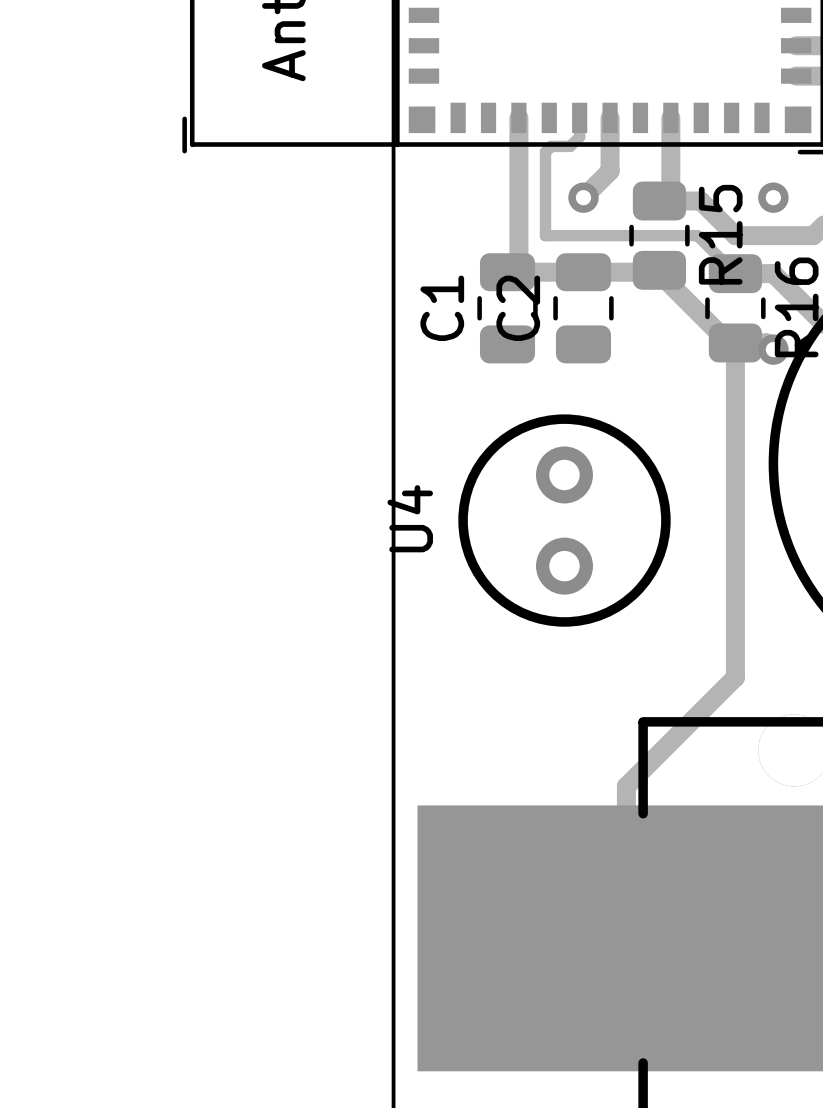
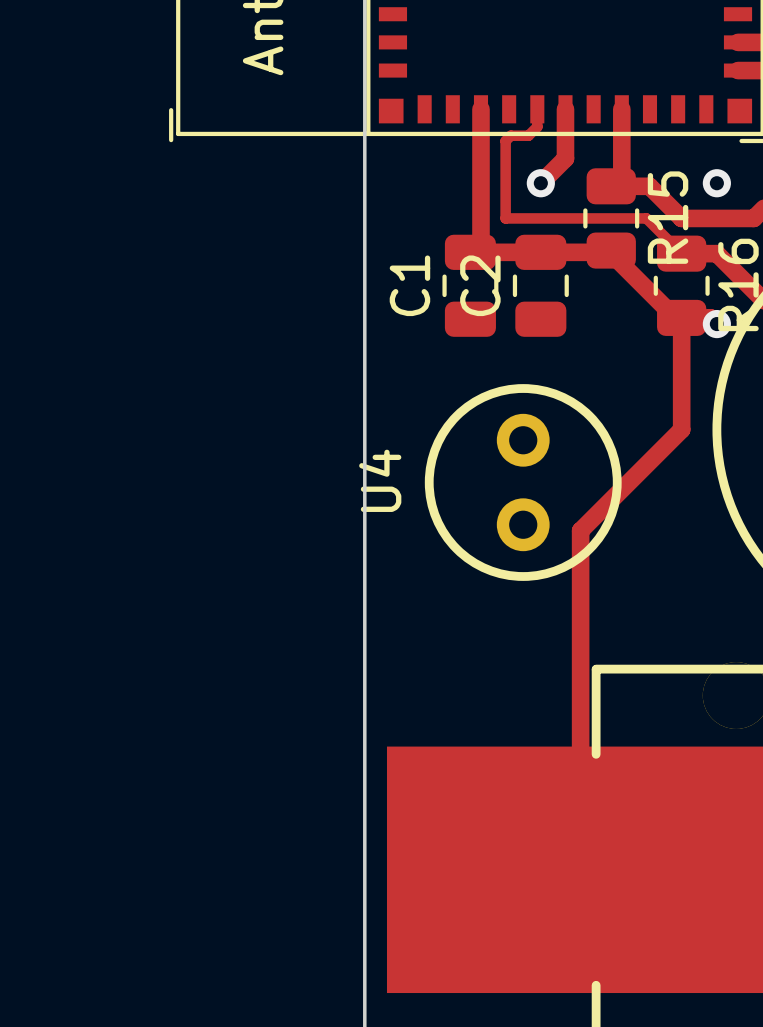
track: (735, 463) (735, 677) (626, 786) -> (681, 429) (580, 530) (580, 728)

